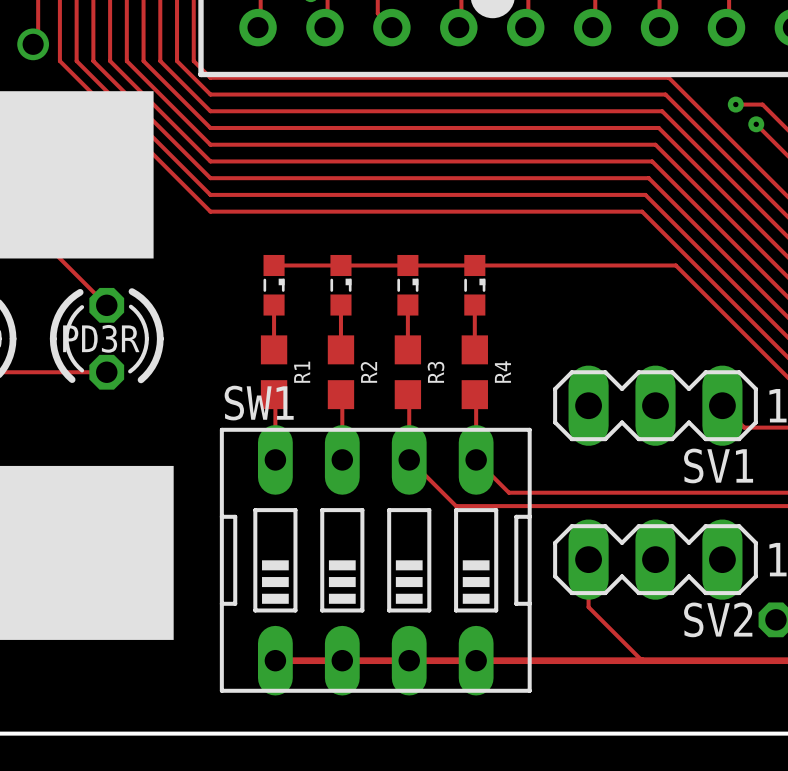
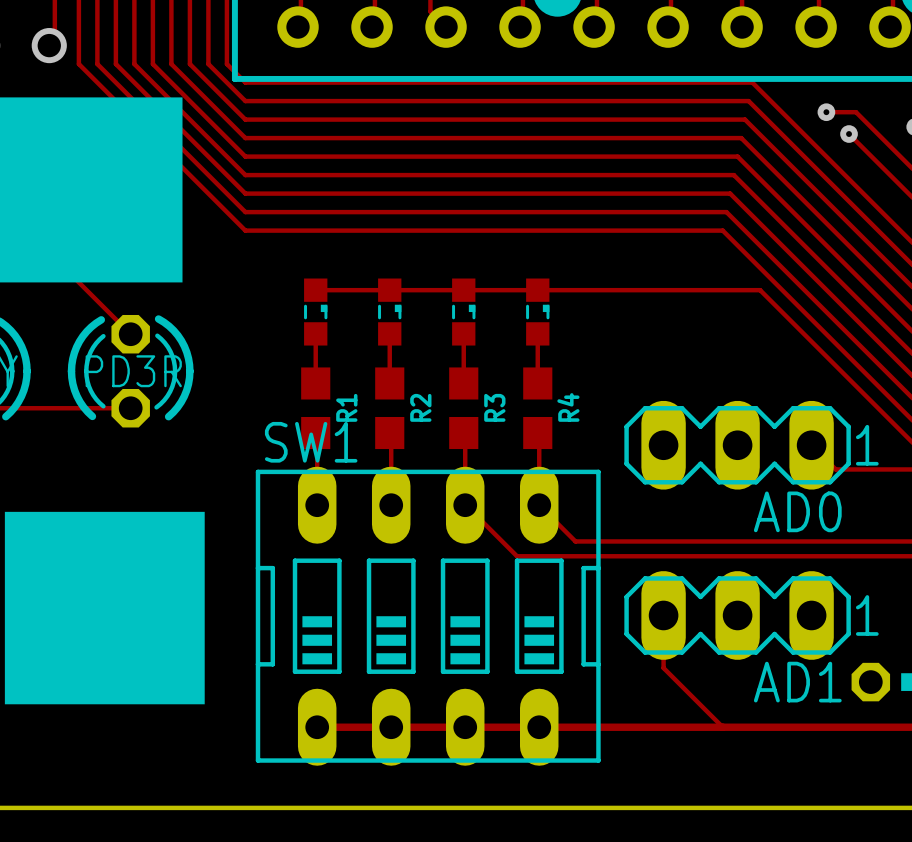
SV1 name: SV1 (718, 465) -> AD0 (797, 511)
SV2 name: SV2 (718, 619) -> AD1 (797, 682)

